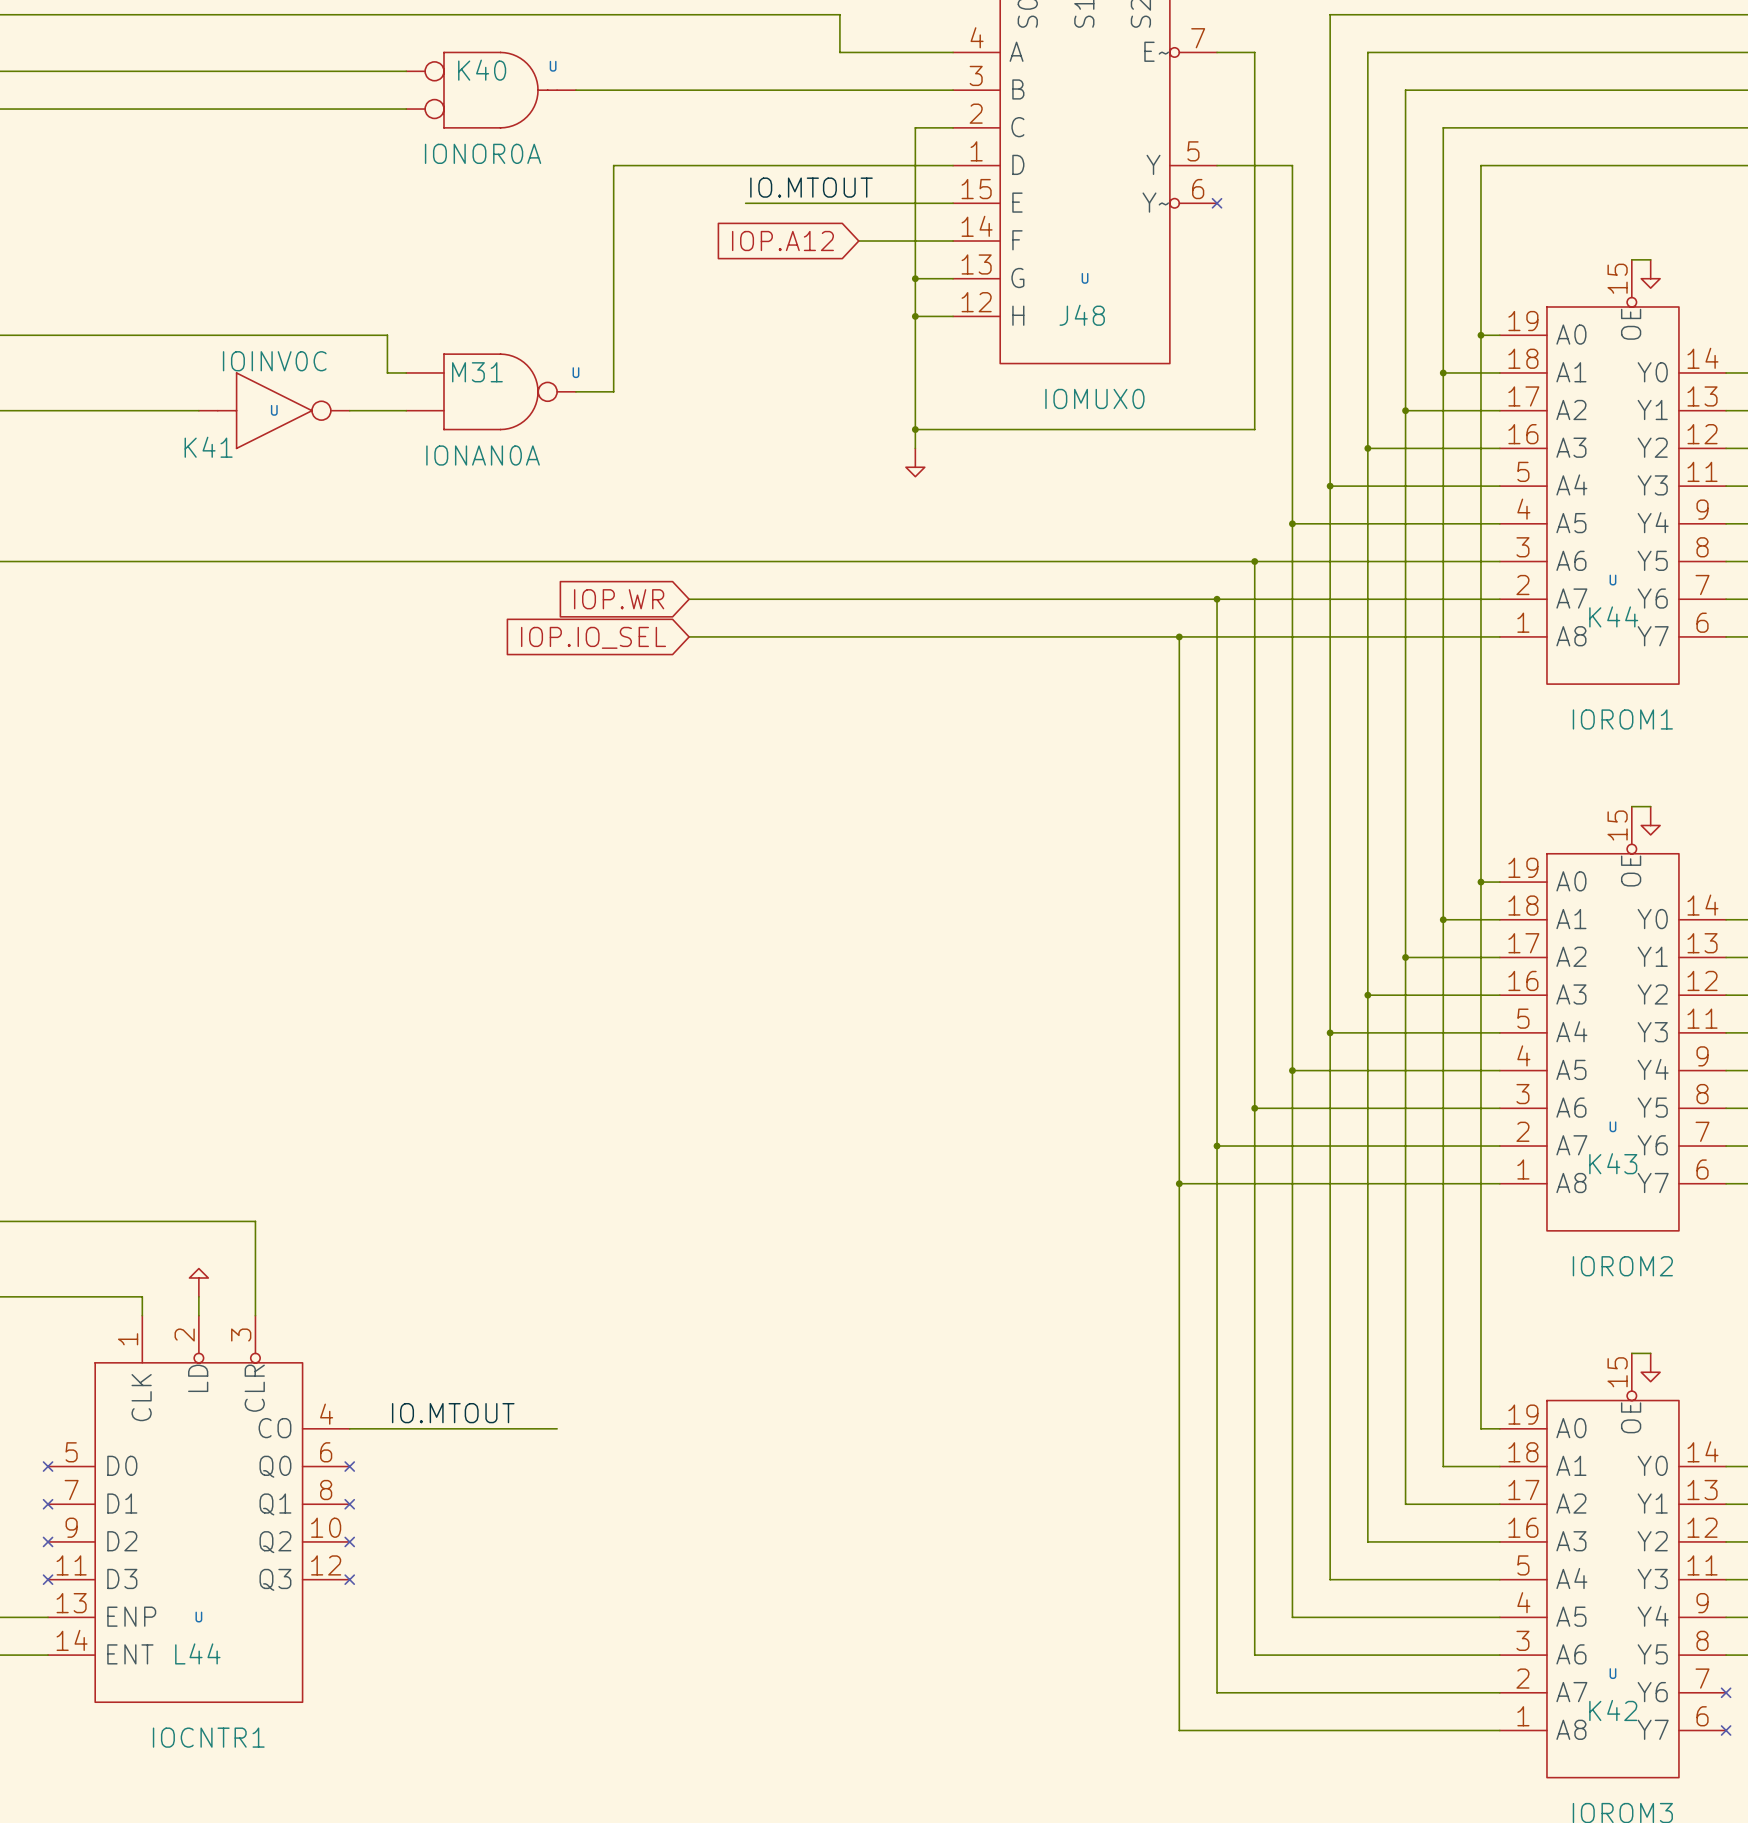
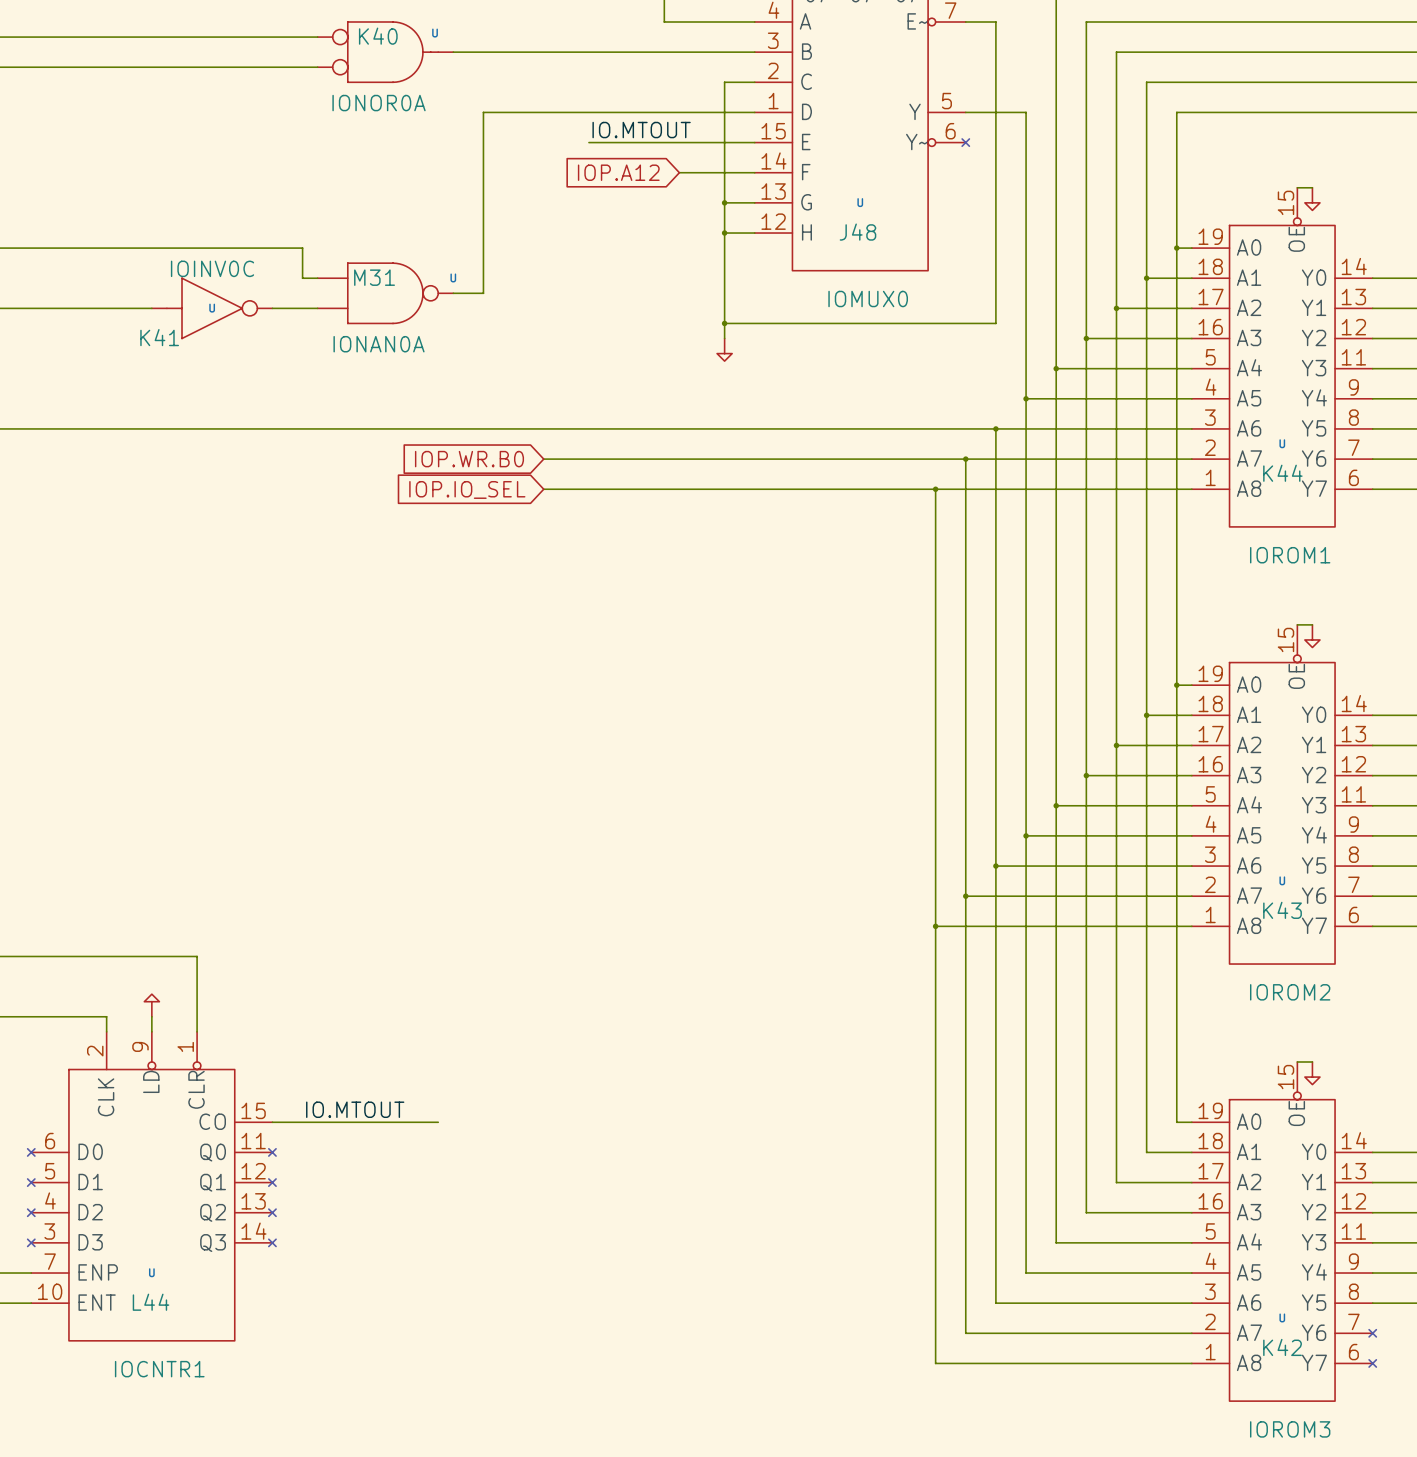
global label: IOP.WR (619, 599) -> IOP.WR.B0 (469, 459)
U symbol: [48, 1315, 350, 1703] -> [31, 1031, 273, 1341]

